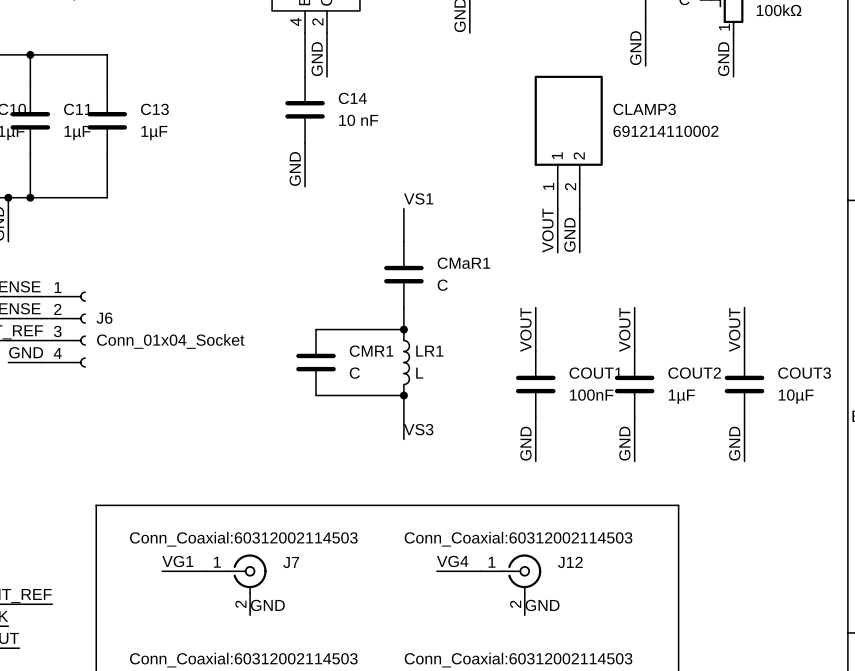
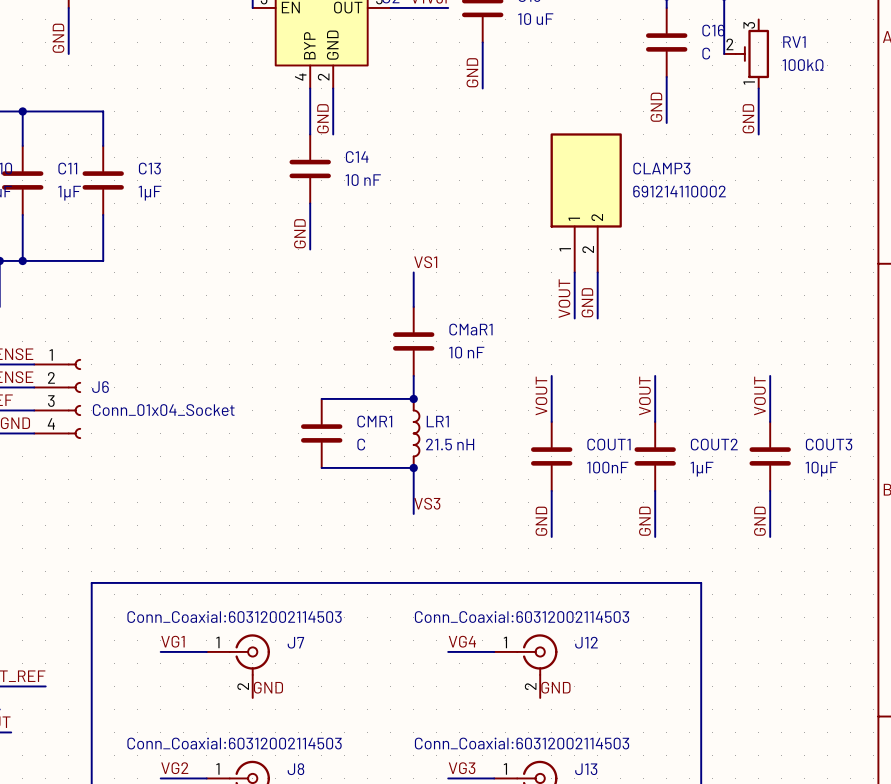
CMaR1 value: C (442, 285) -> 10 nF (466, 352)
LR1 value: L (419, 373) -> 21.5 nH (450, 444)

